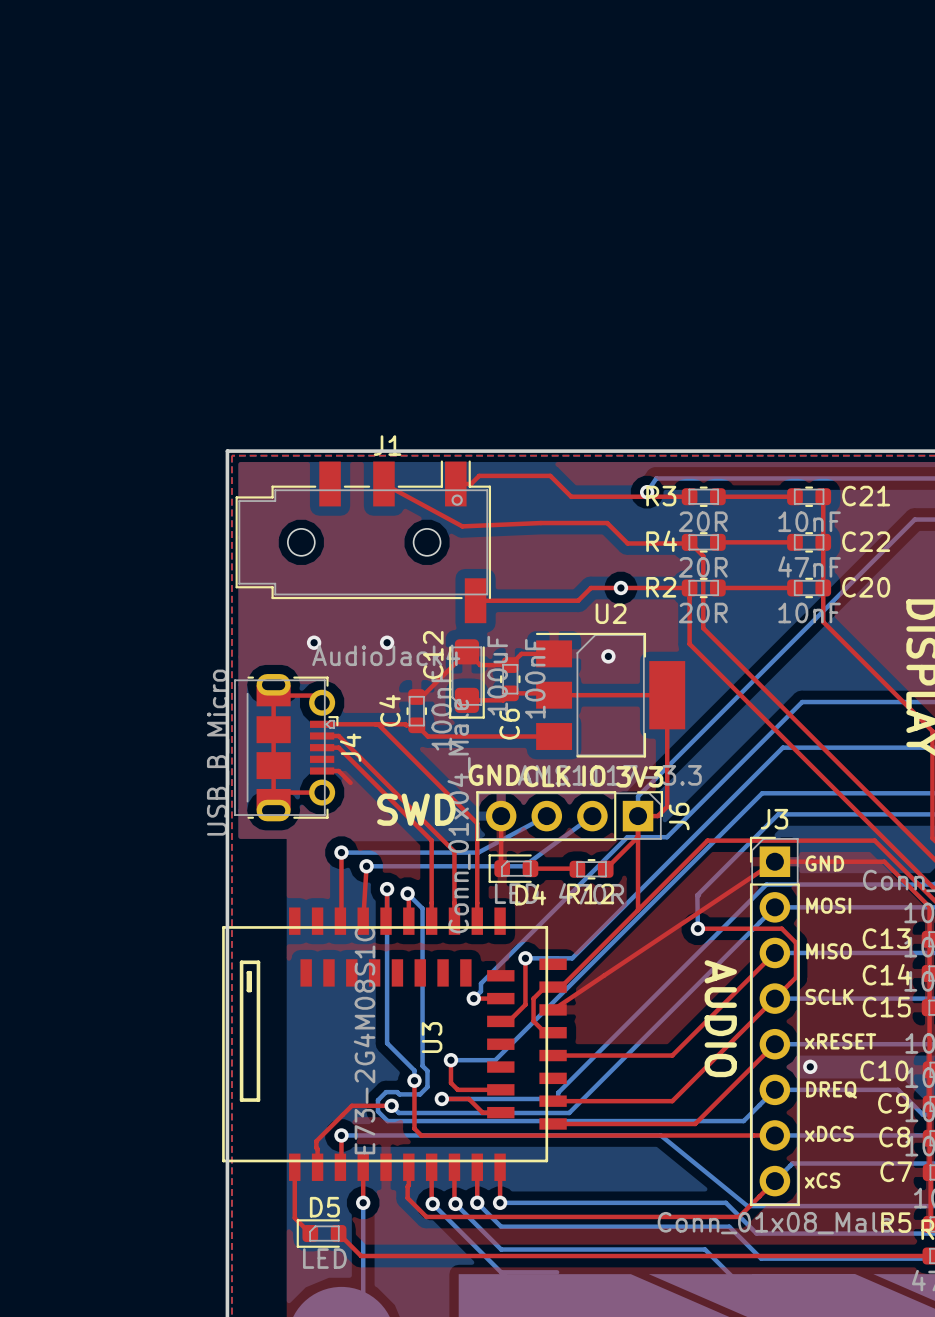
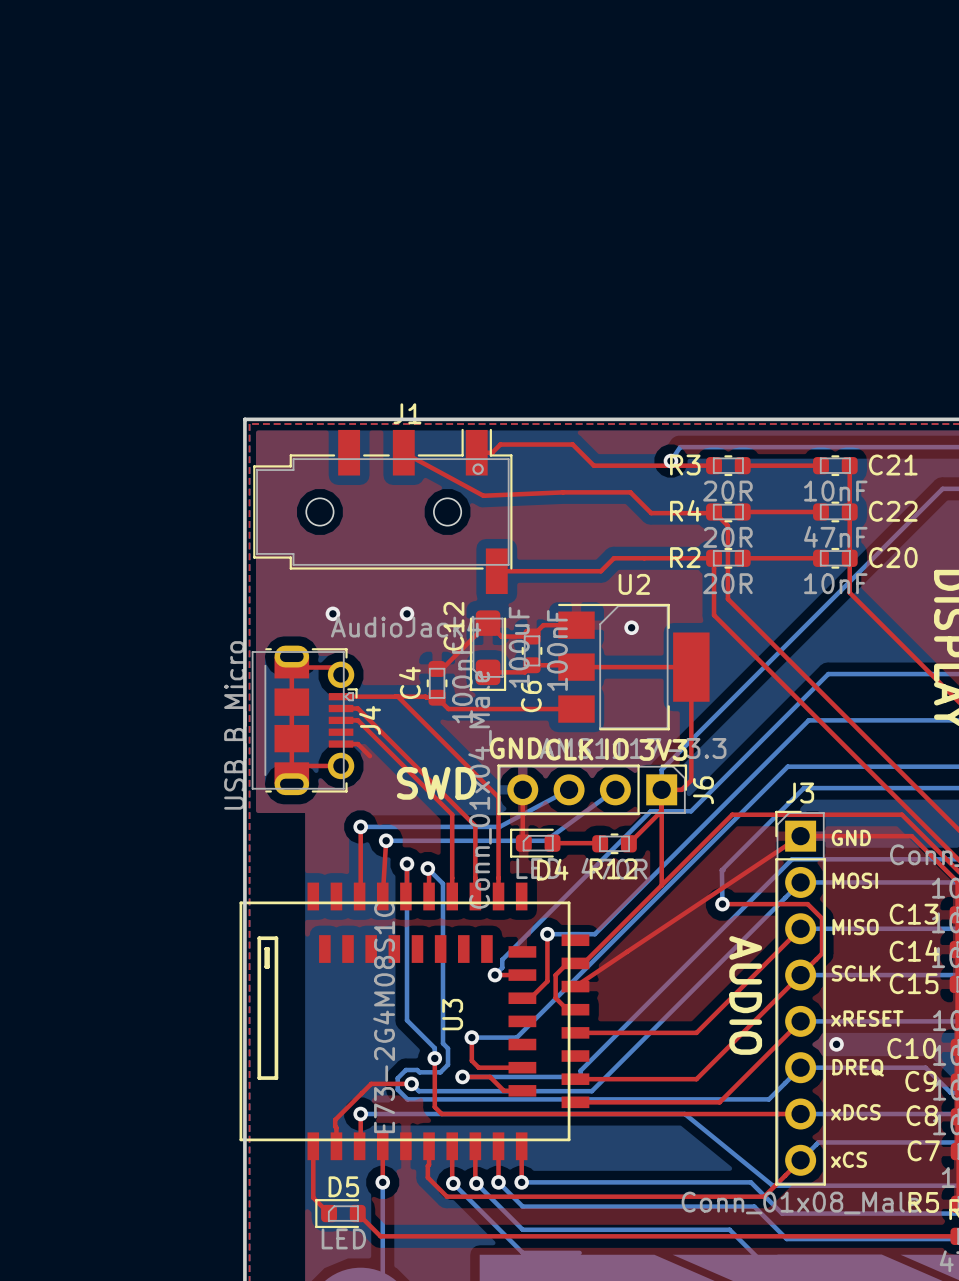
via: (620, 587) -> none

